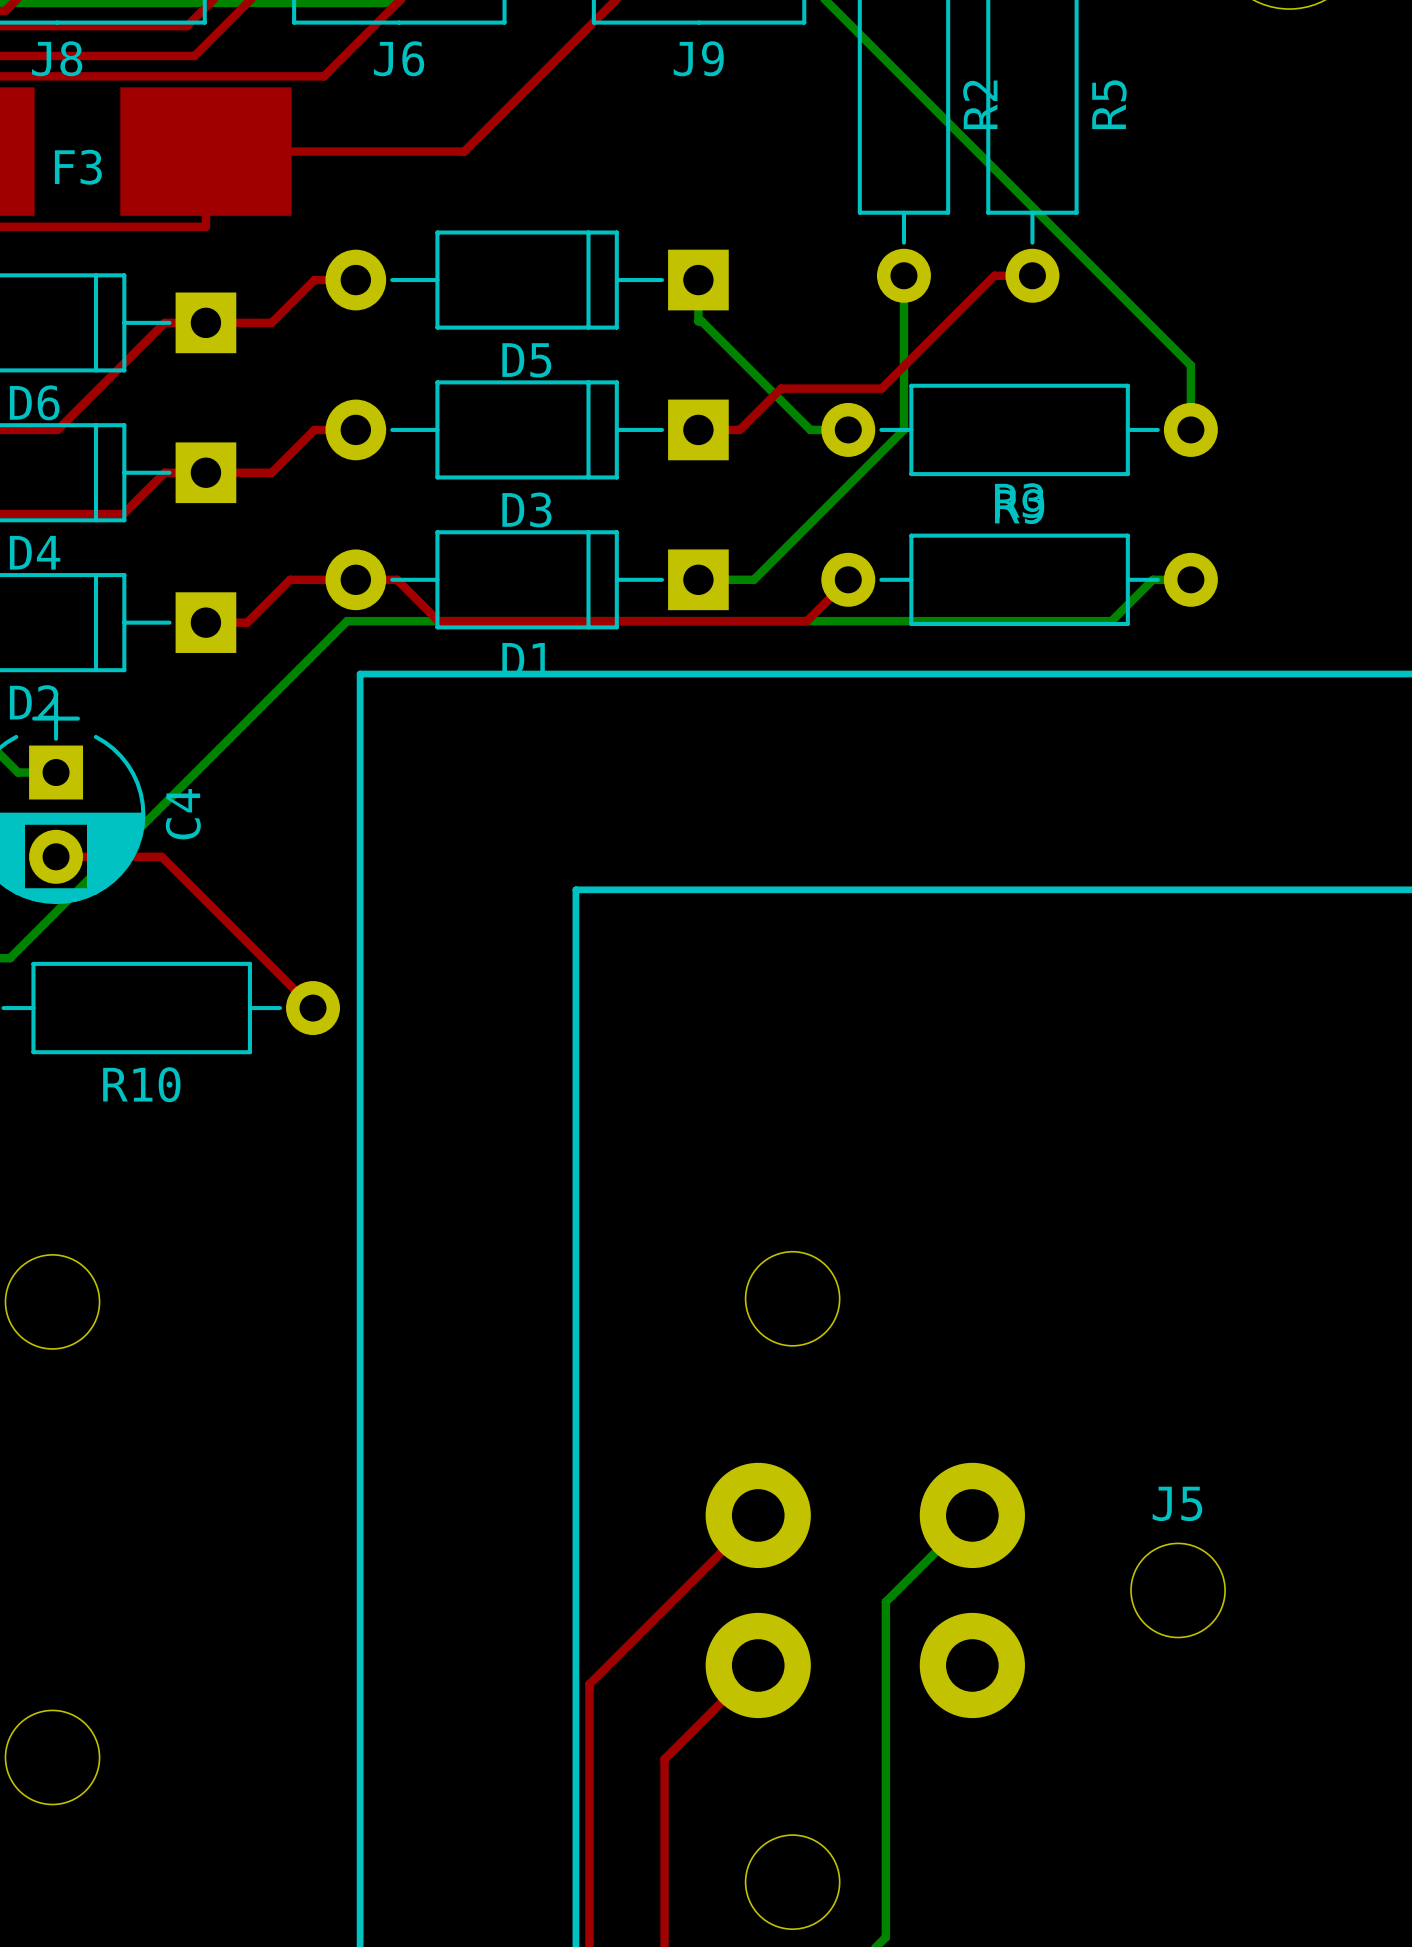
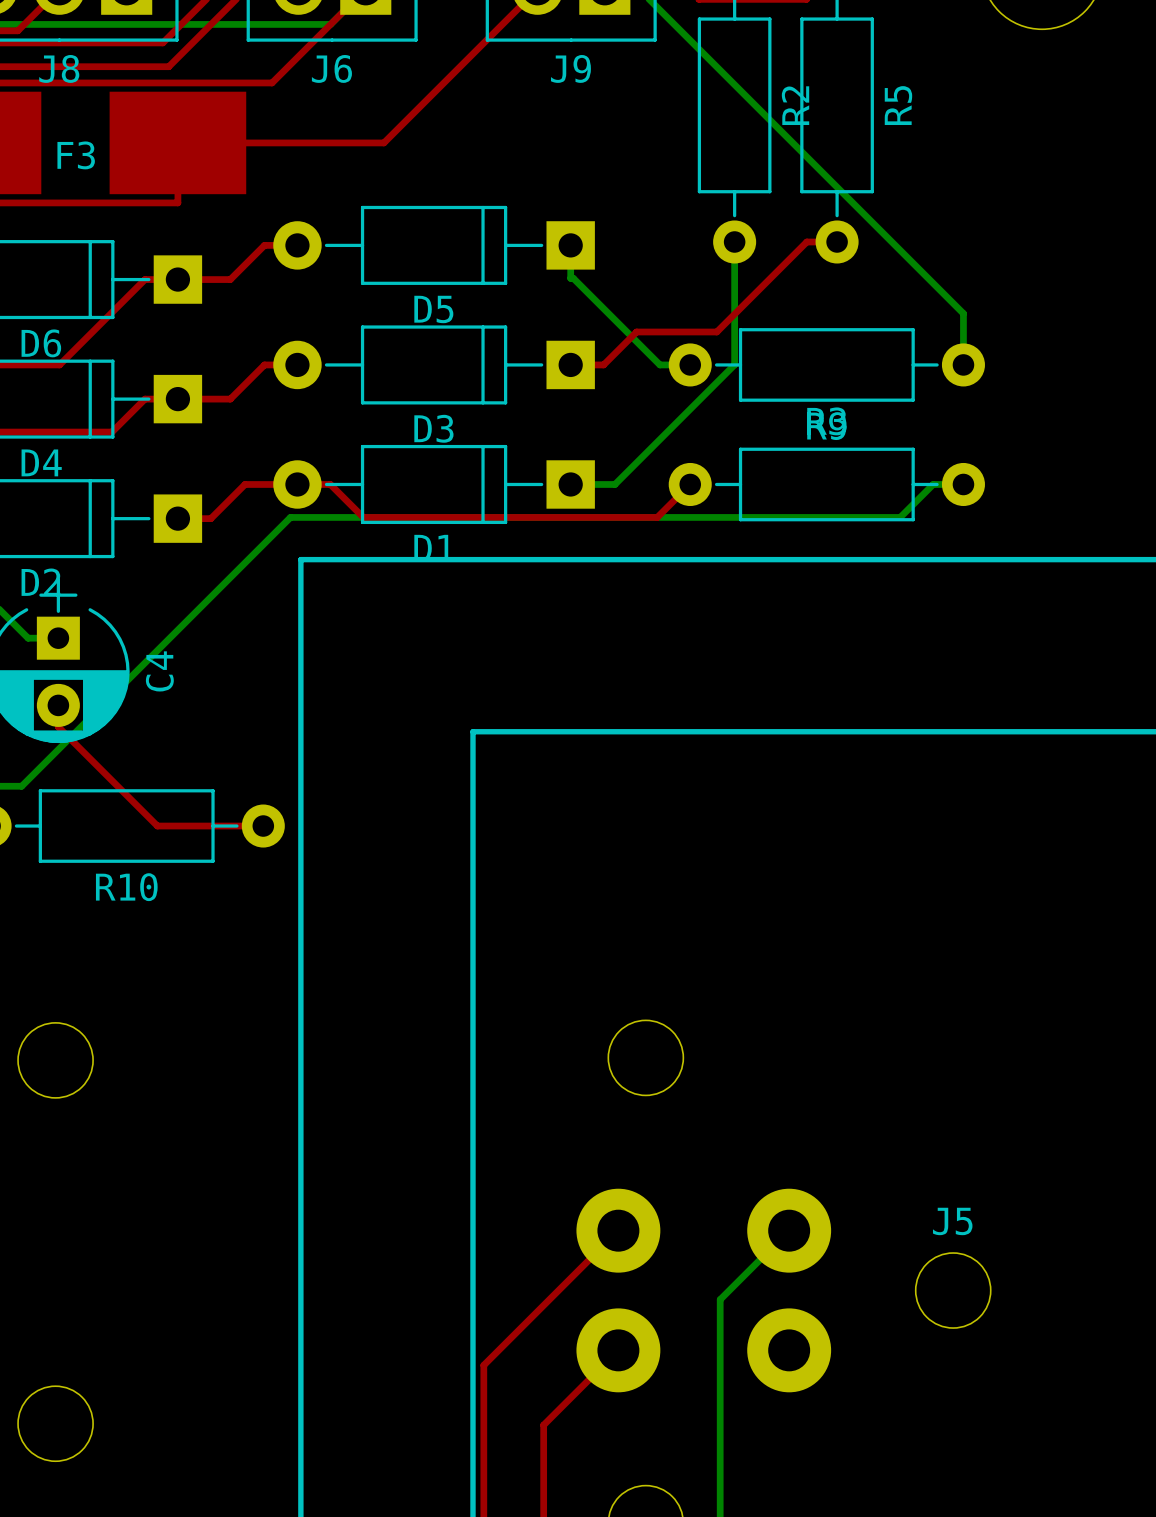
top track: (56, 856) (161, 856) (313, 1008) -> (58, 705) (58, 726) (157, 826) (263, 826)

